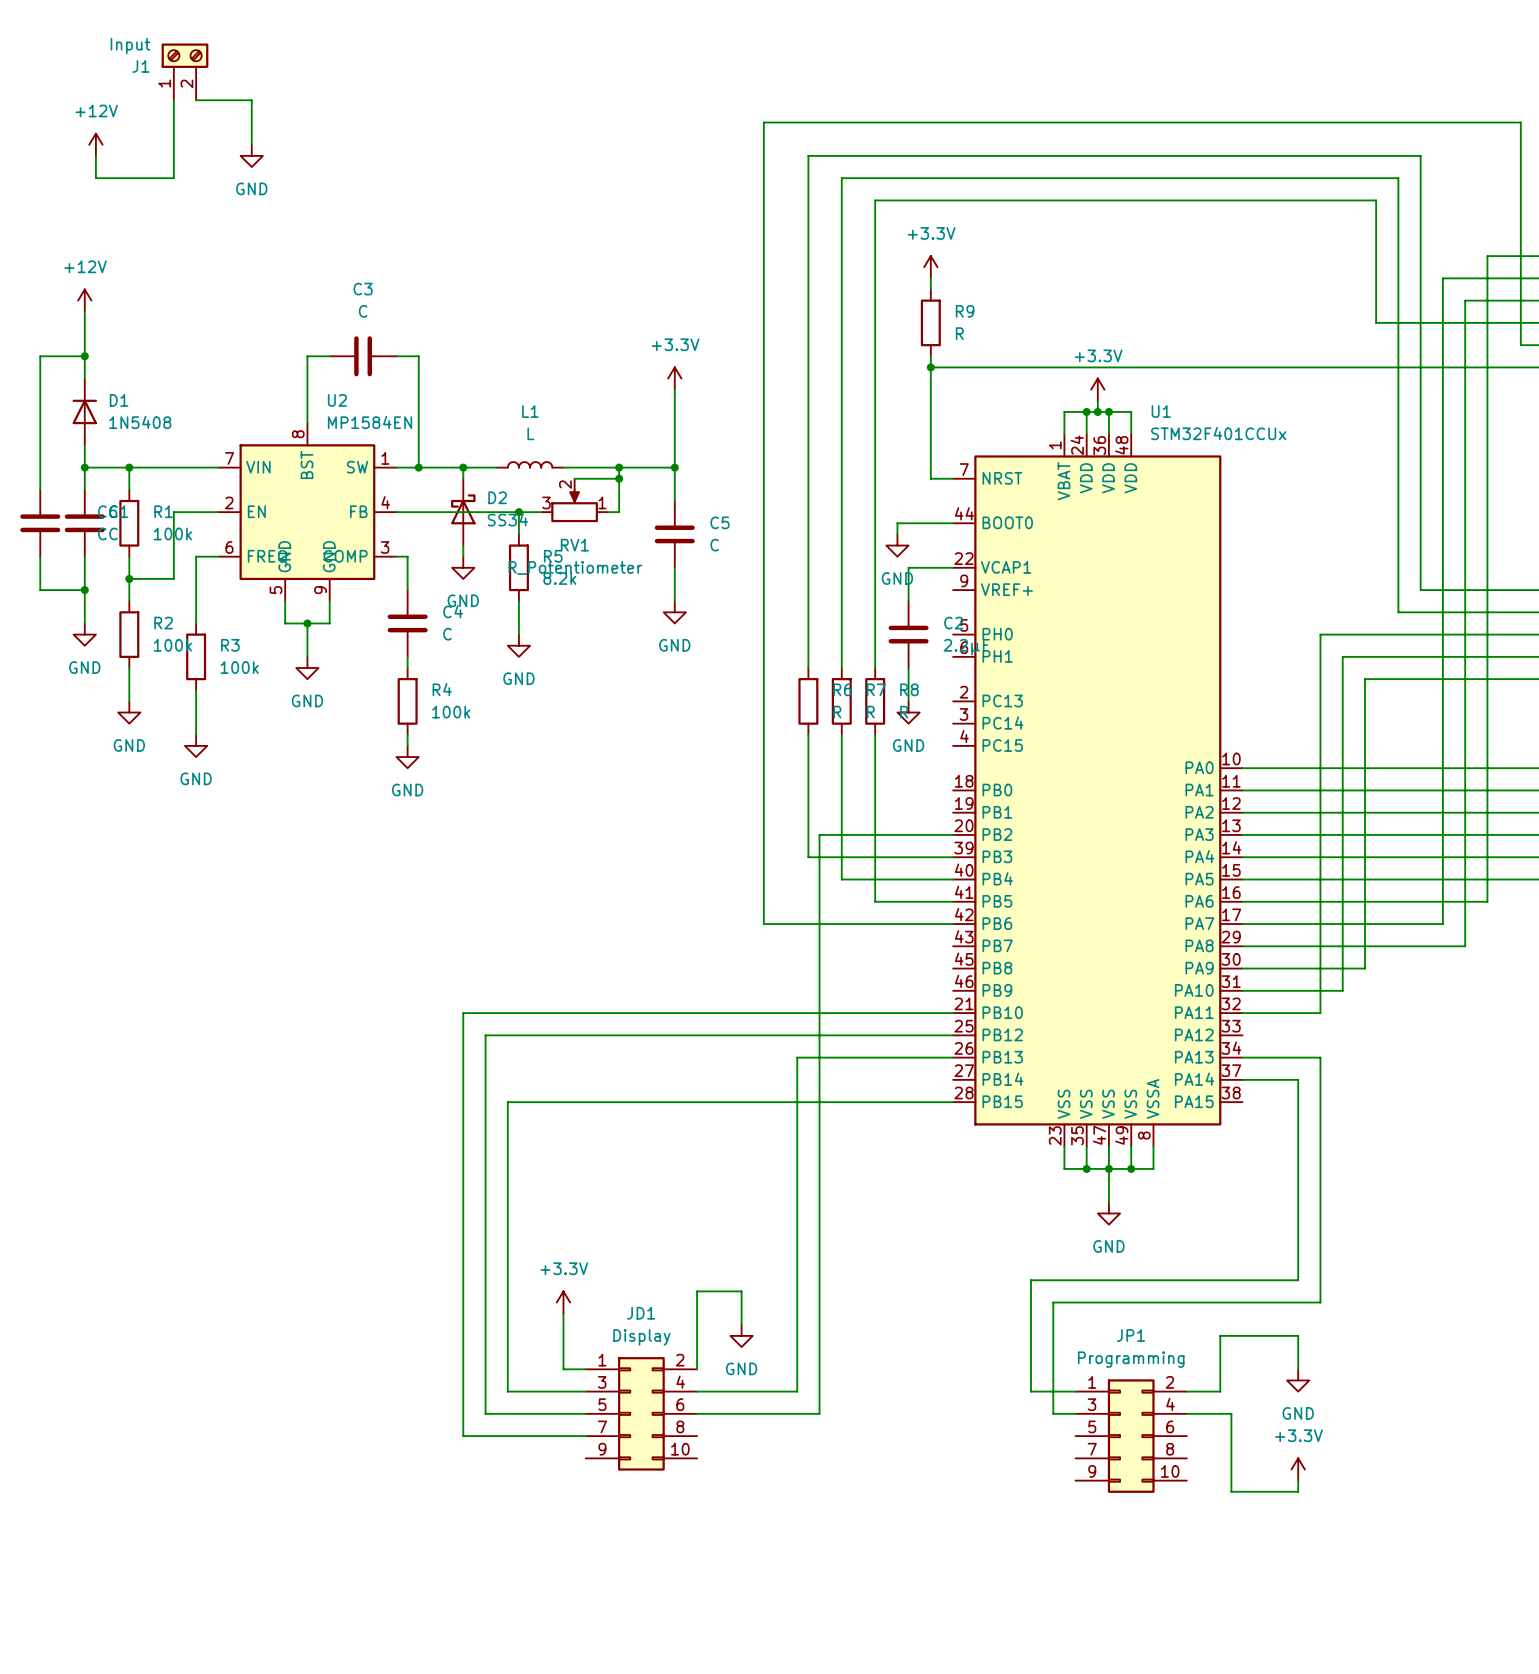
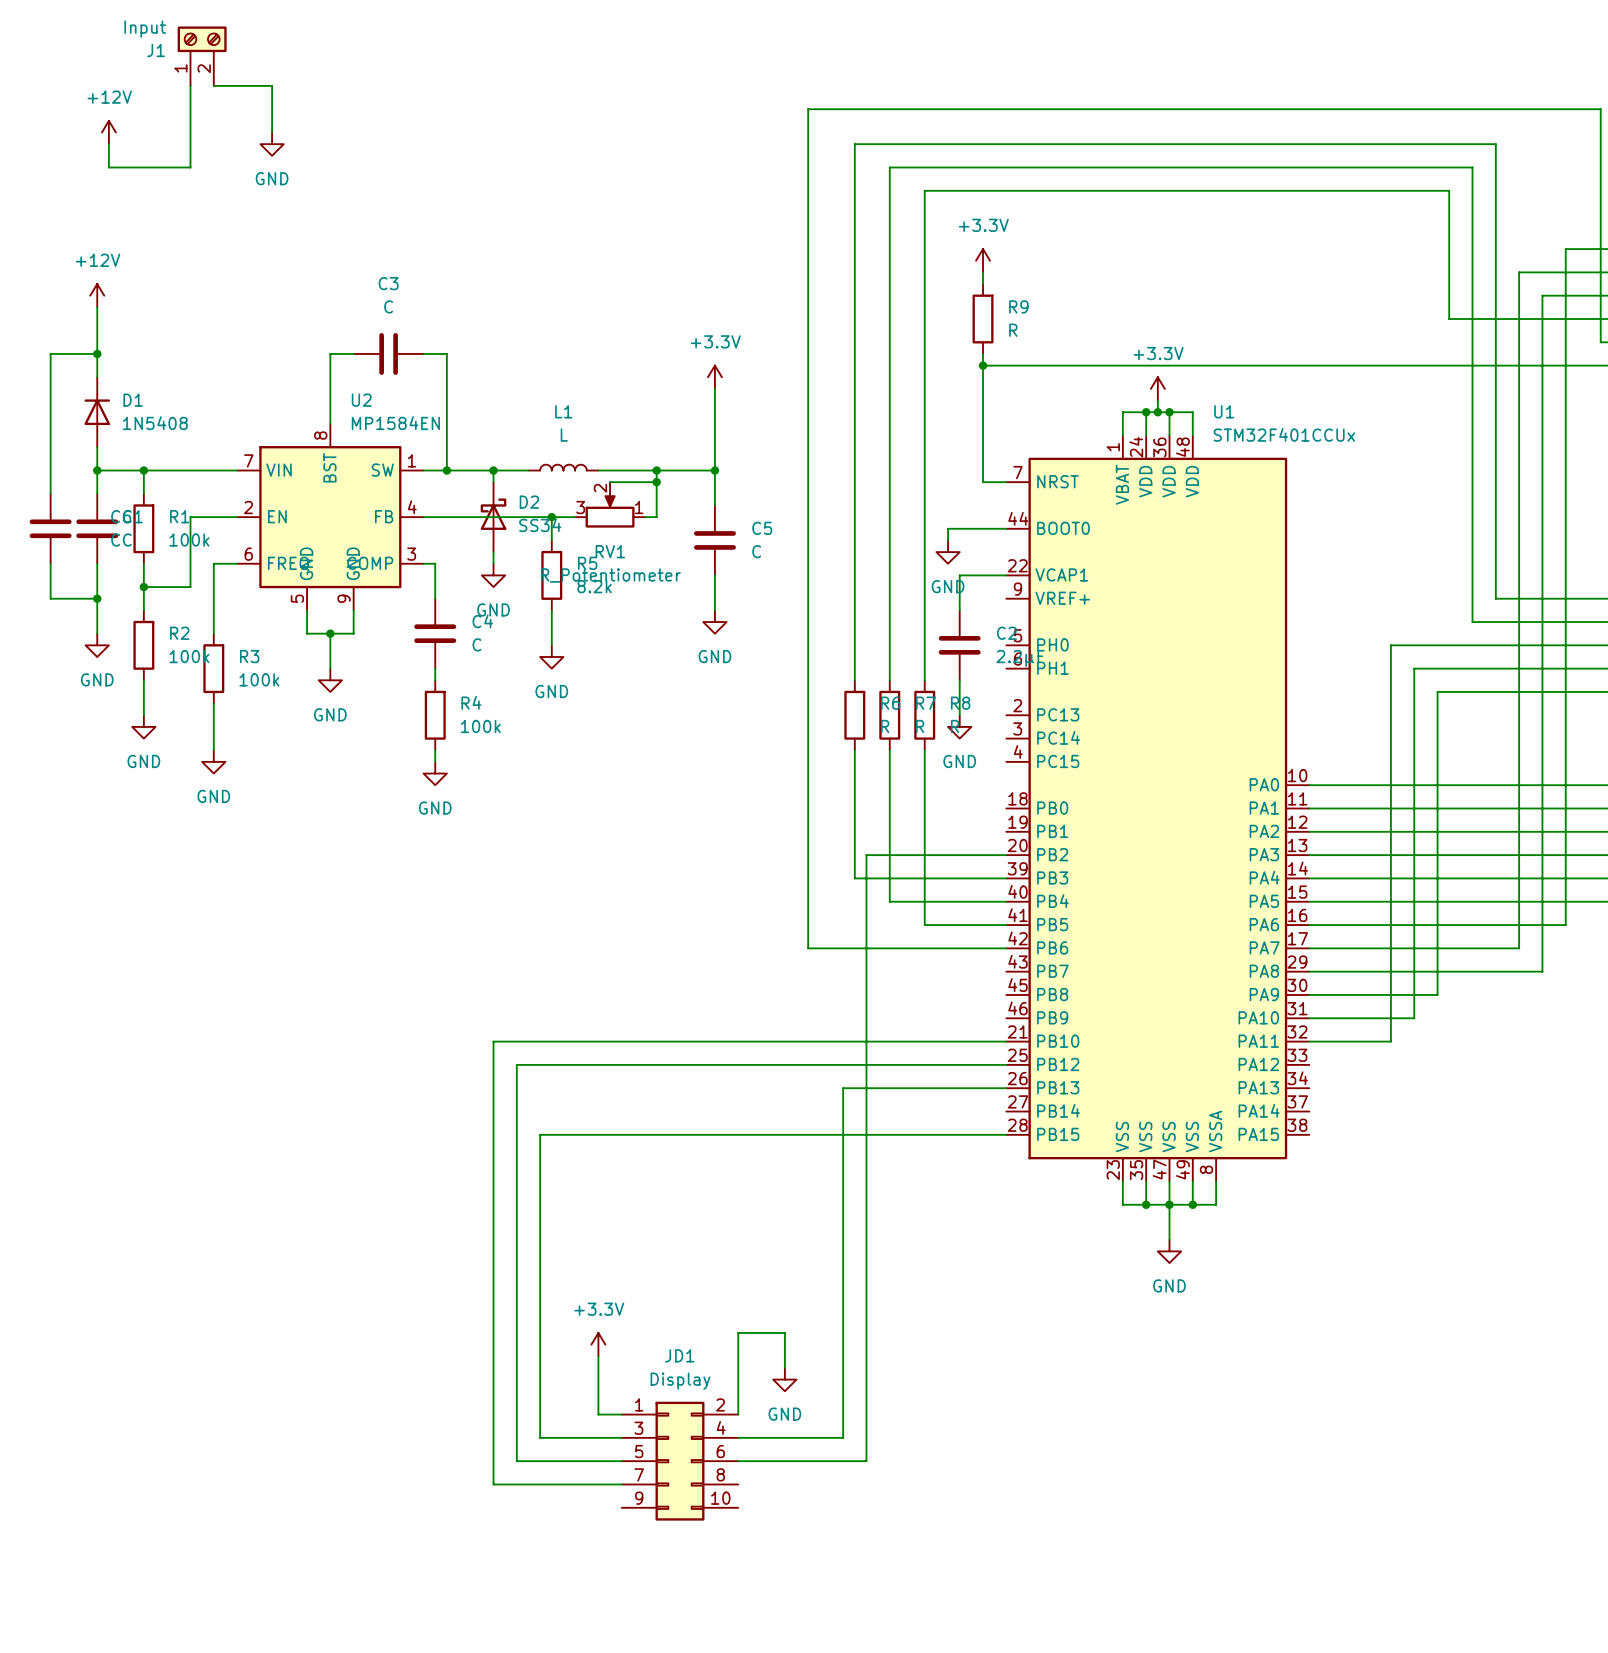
wire: (1242, 1057) (1320, 1057) (1320, 1302) (1053, 1302) (1053, 1413) (1075, 1413) -> none
wire: (1242, 1079) (1298, 1079) (1298, 1280) (1031, 1280) (1031, 1391) (1075, 1391) -> none
wire: (1298, 1369) (1298, 1335) (1220, 1335) (1220, 1391) (1186, 1391) -> none
power symbol: GND (1298, 1380) -> none
wire: (1186, 1413) (1231, 1413) (1231, 1491) (1298, 1491) (1298, 1480) -> none
JP1: Programming (1131, 1436) -> none
power symbol: +3.3V (1298, 1469) -> none

